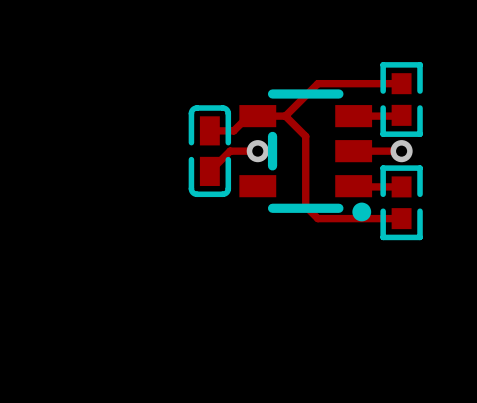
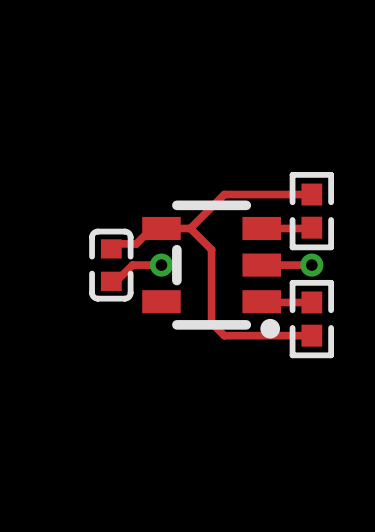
part footprint: [188, 105, 232, 198] -> [89, 228, 134, 302]

